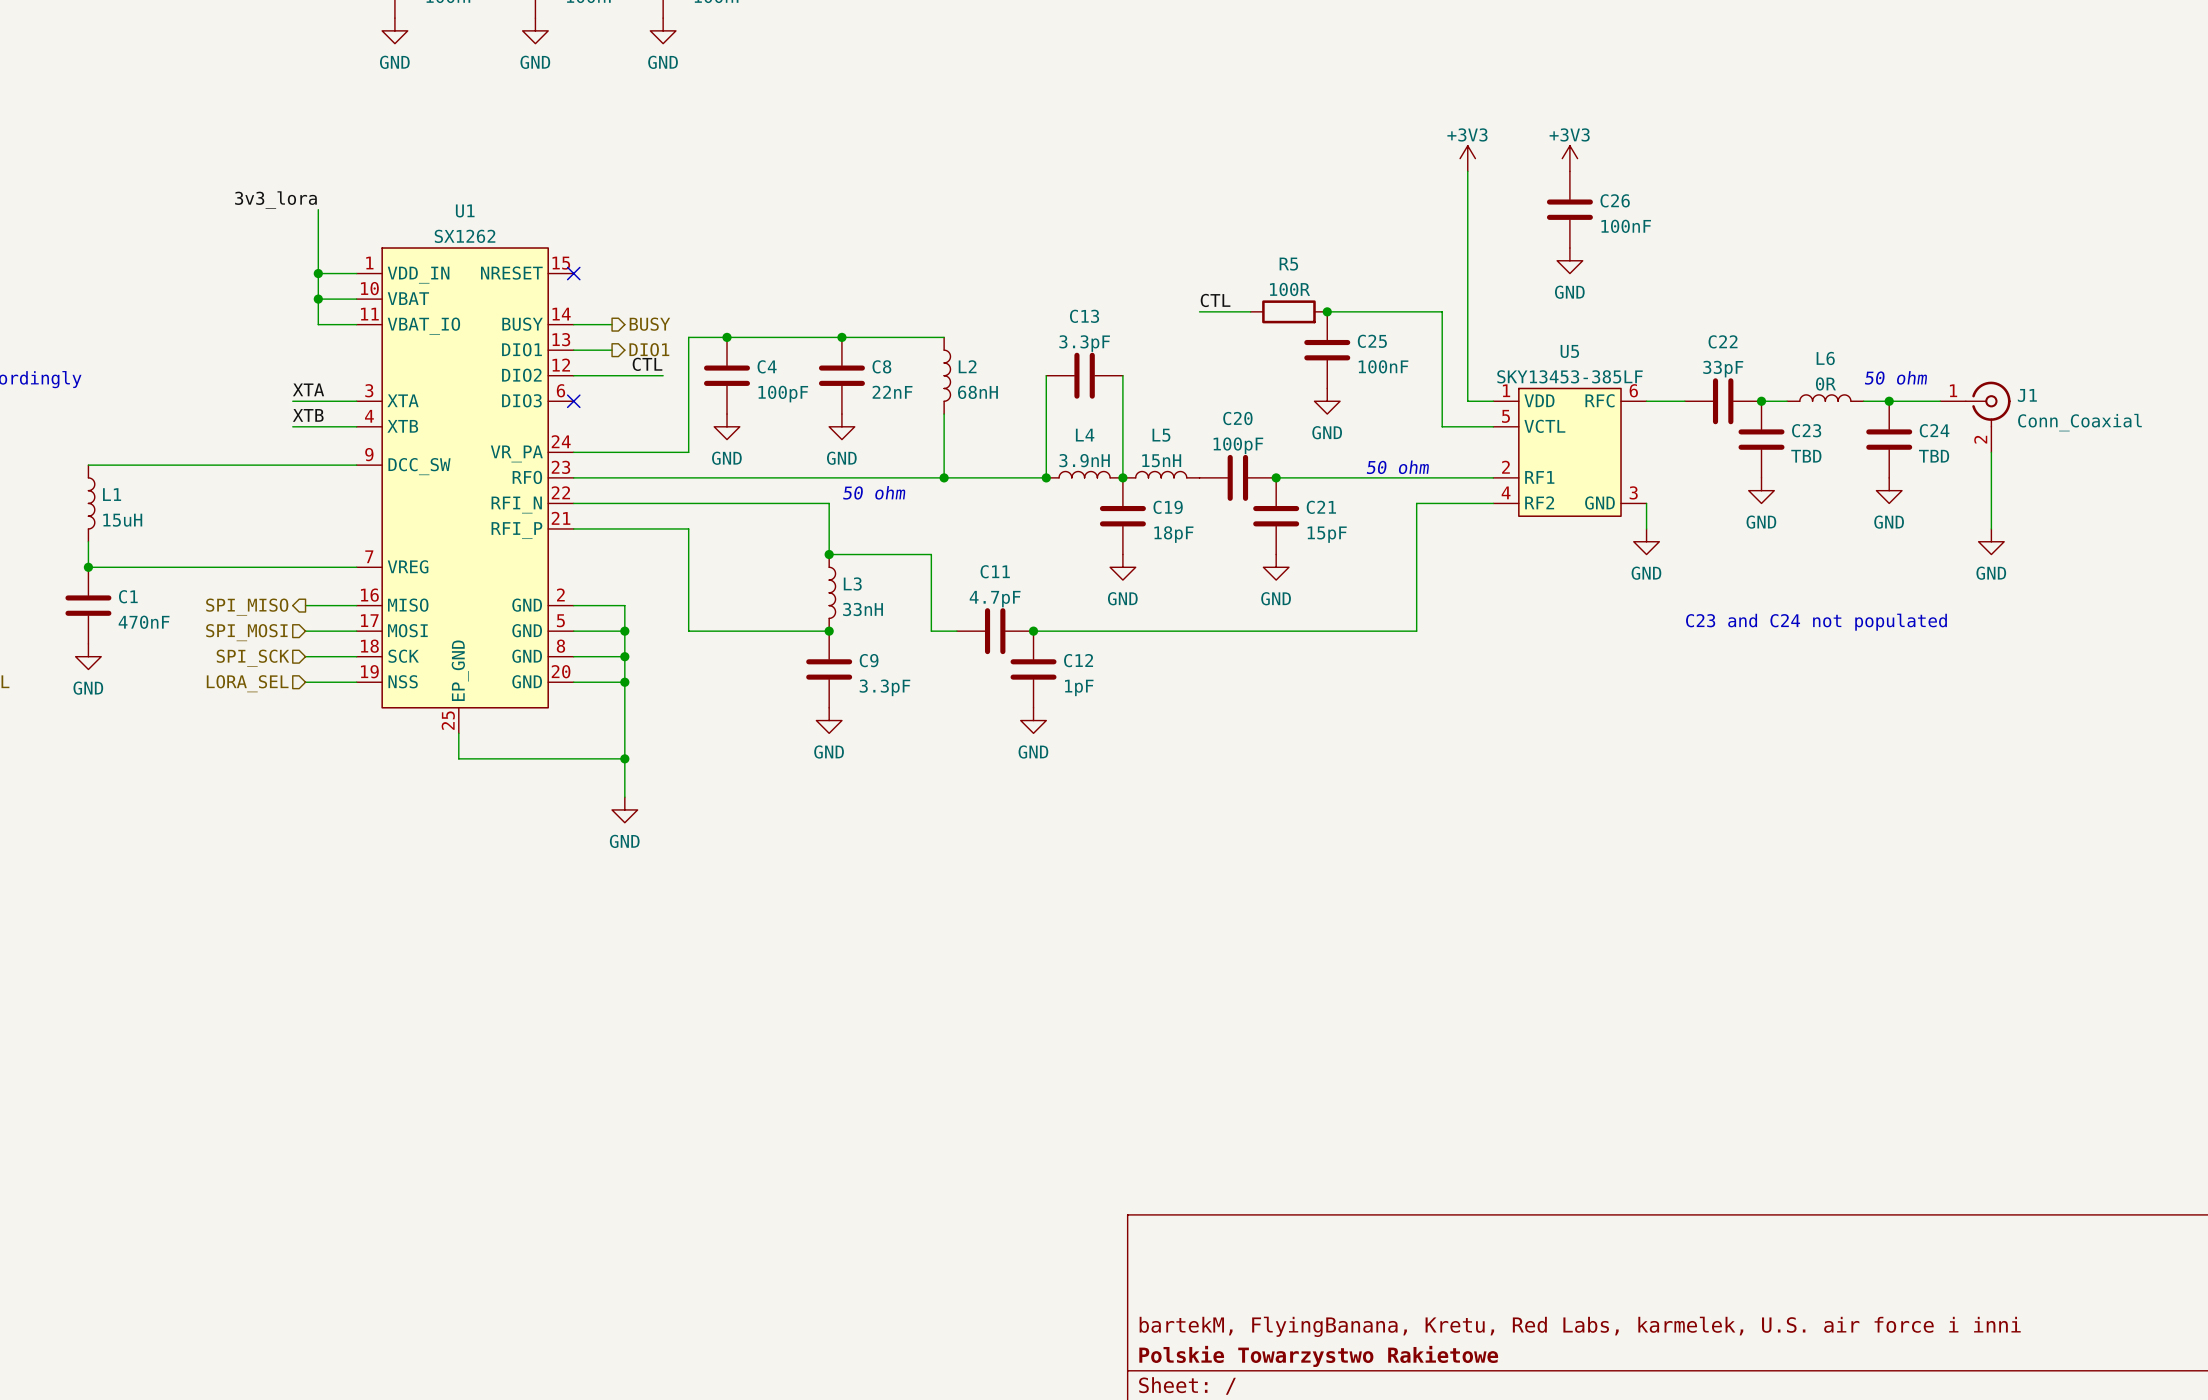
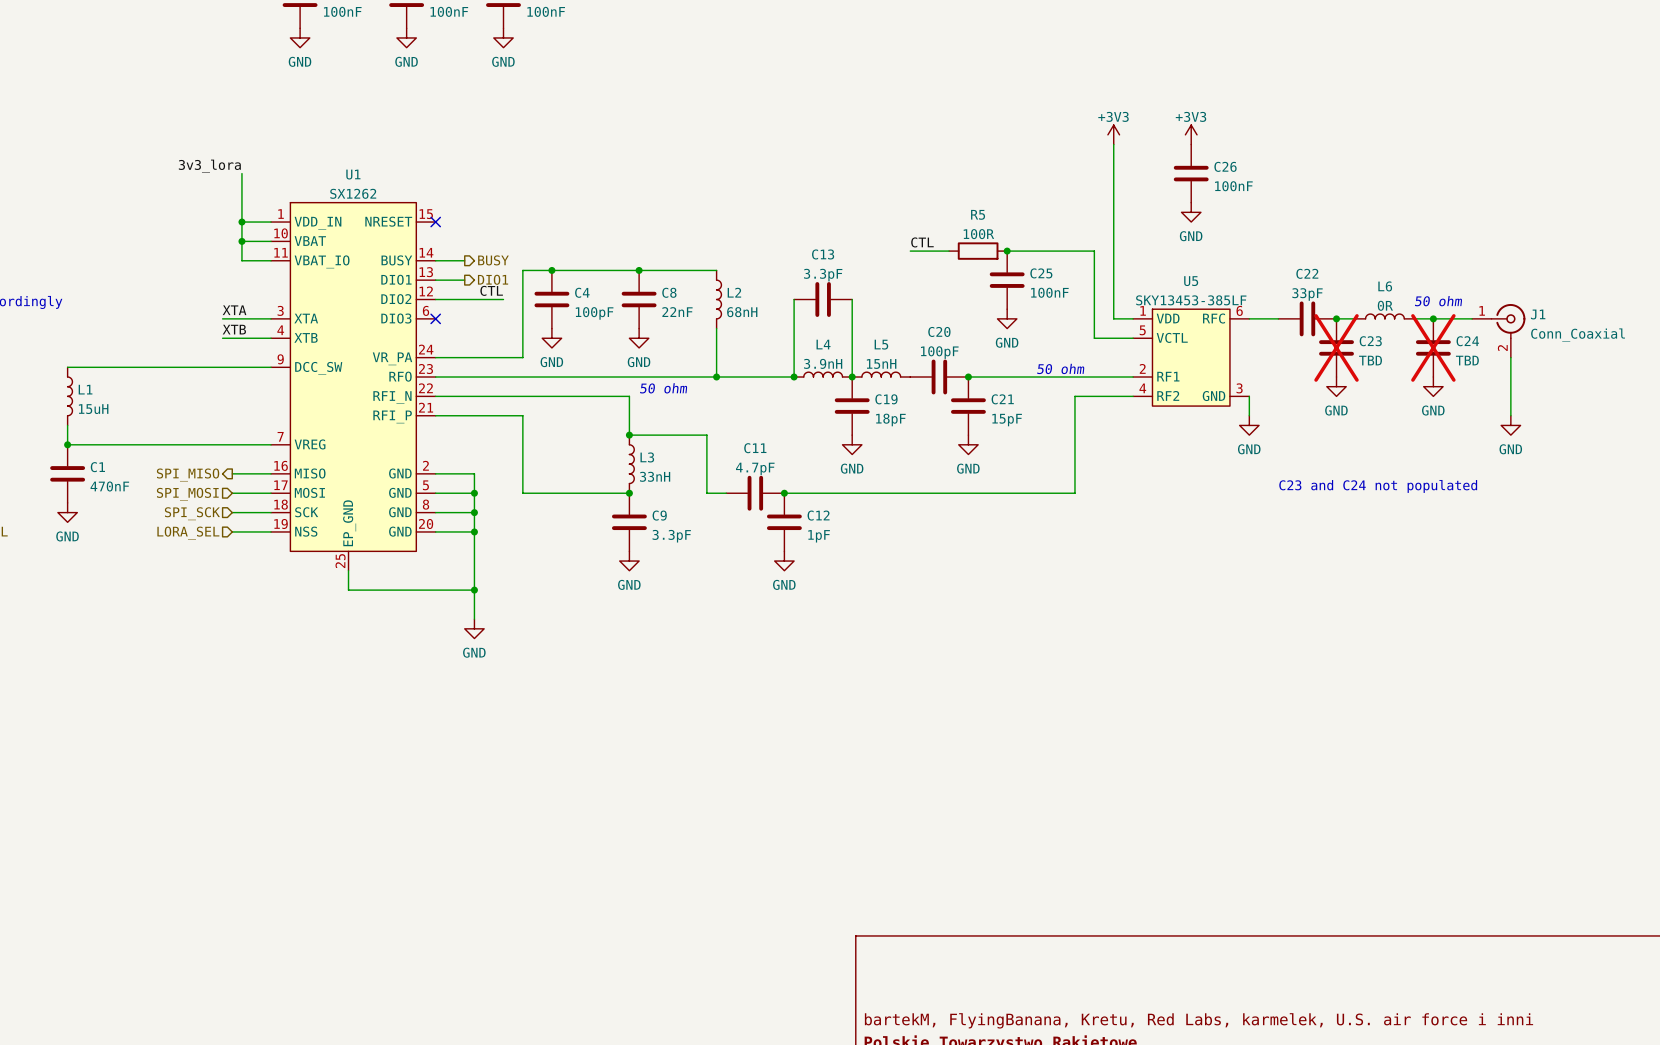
C23 do-not-place cross: none -> (1336, 347)
C24 do-not-place cross: none -> (1433, 347)

